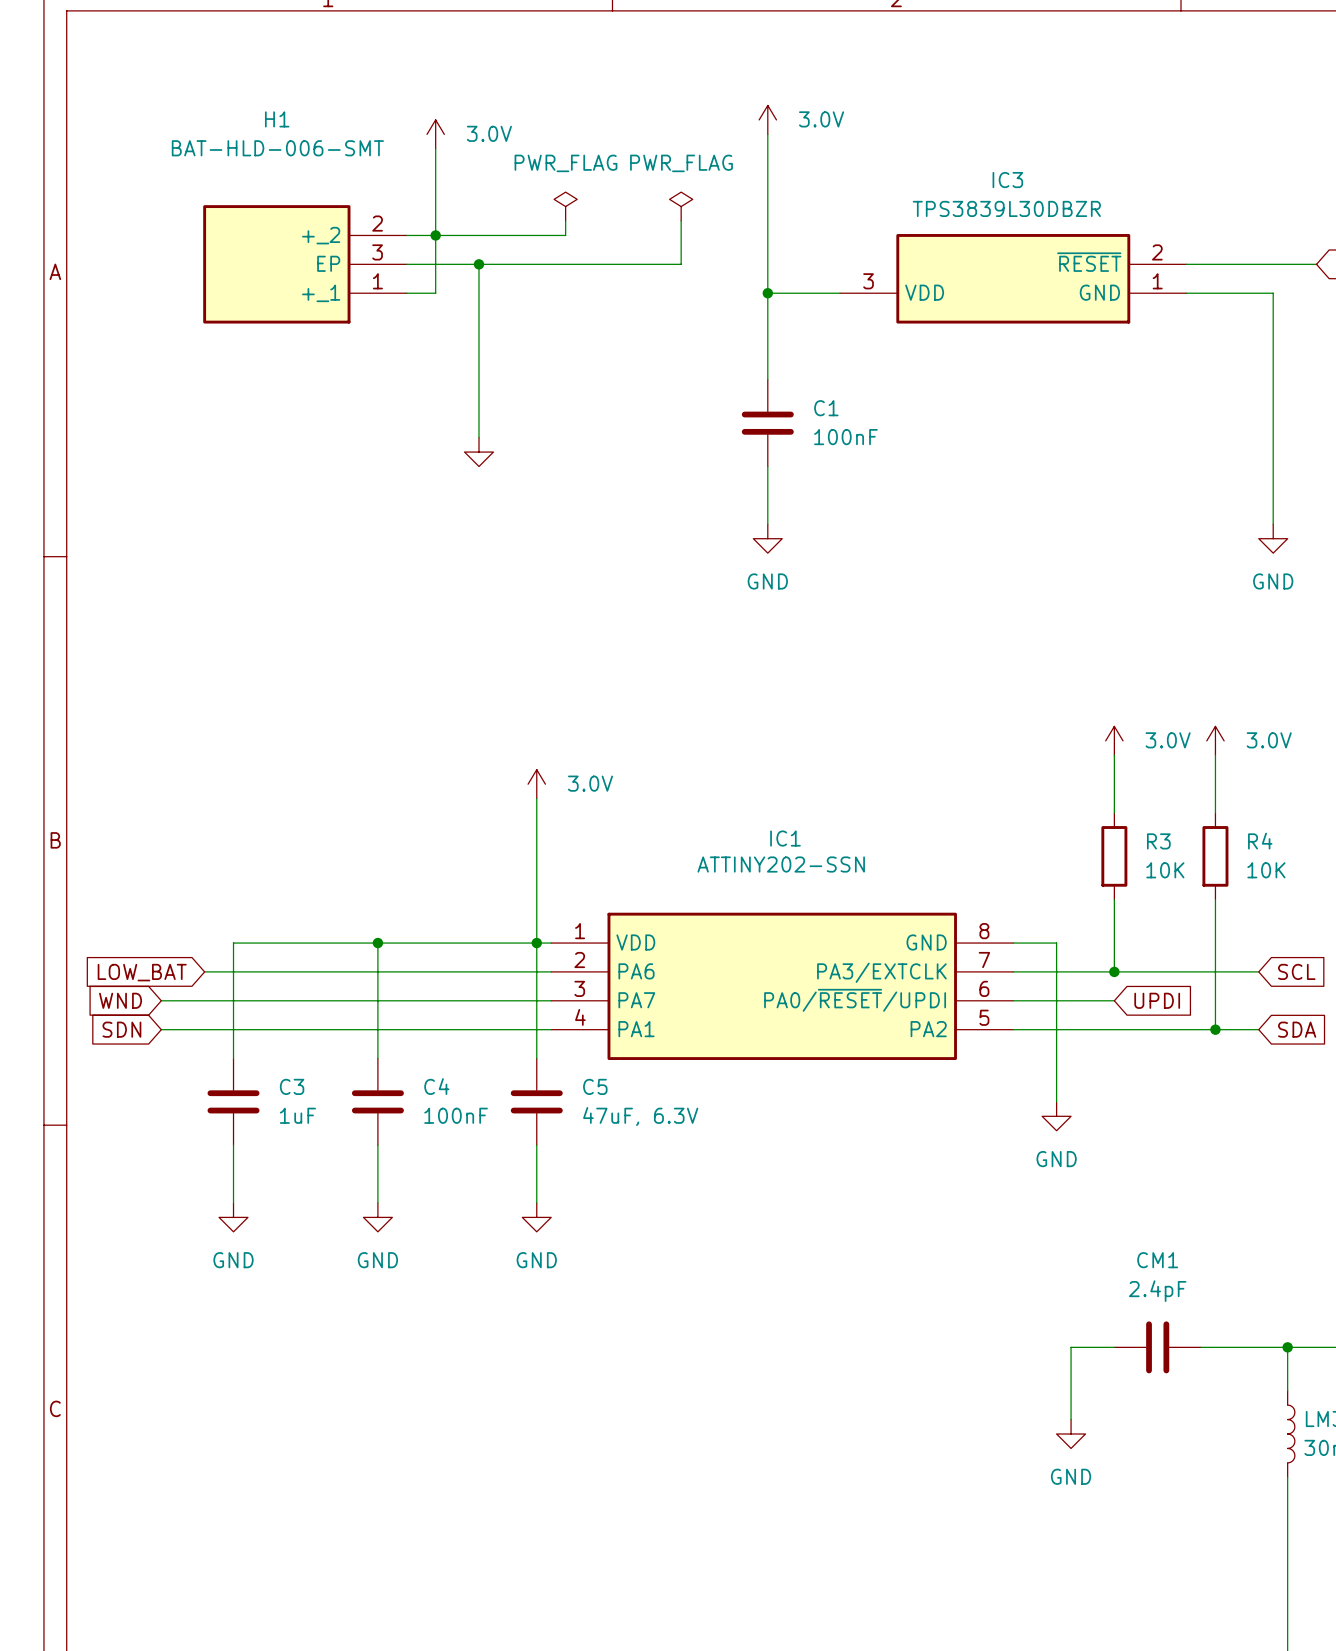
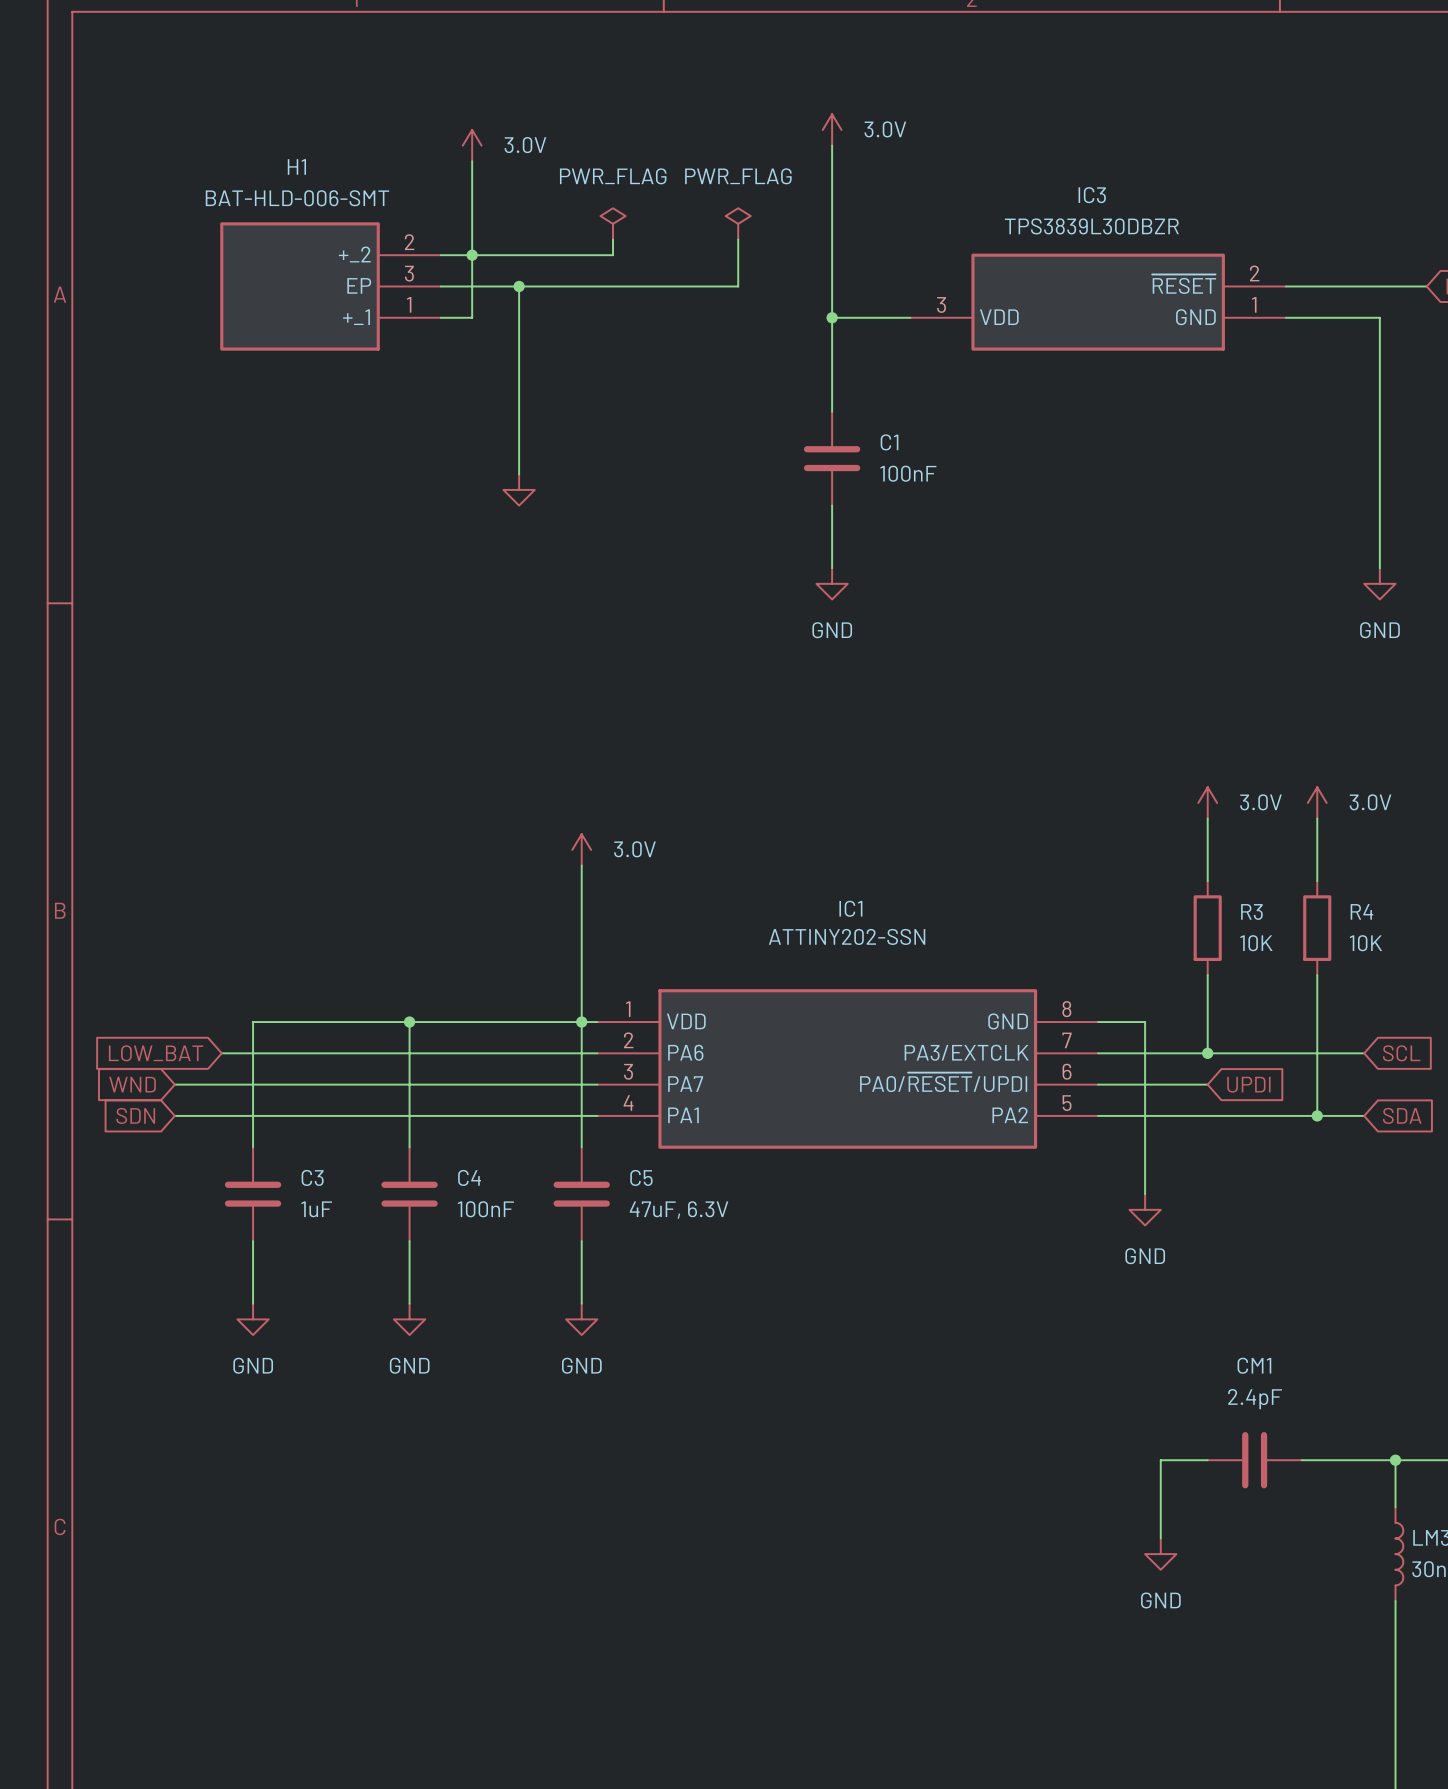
H1 name position: H1 (277, 119) -> H1 (296, 166)
H1 value position: BAT-HLD-006-SMT (277, 148) -> BAT-HLD-006-SMT (297, 198)

